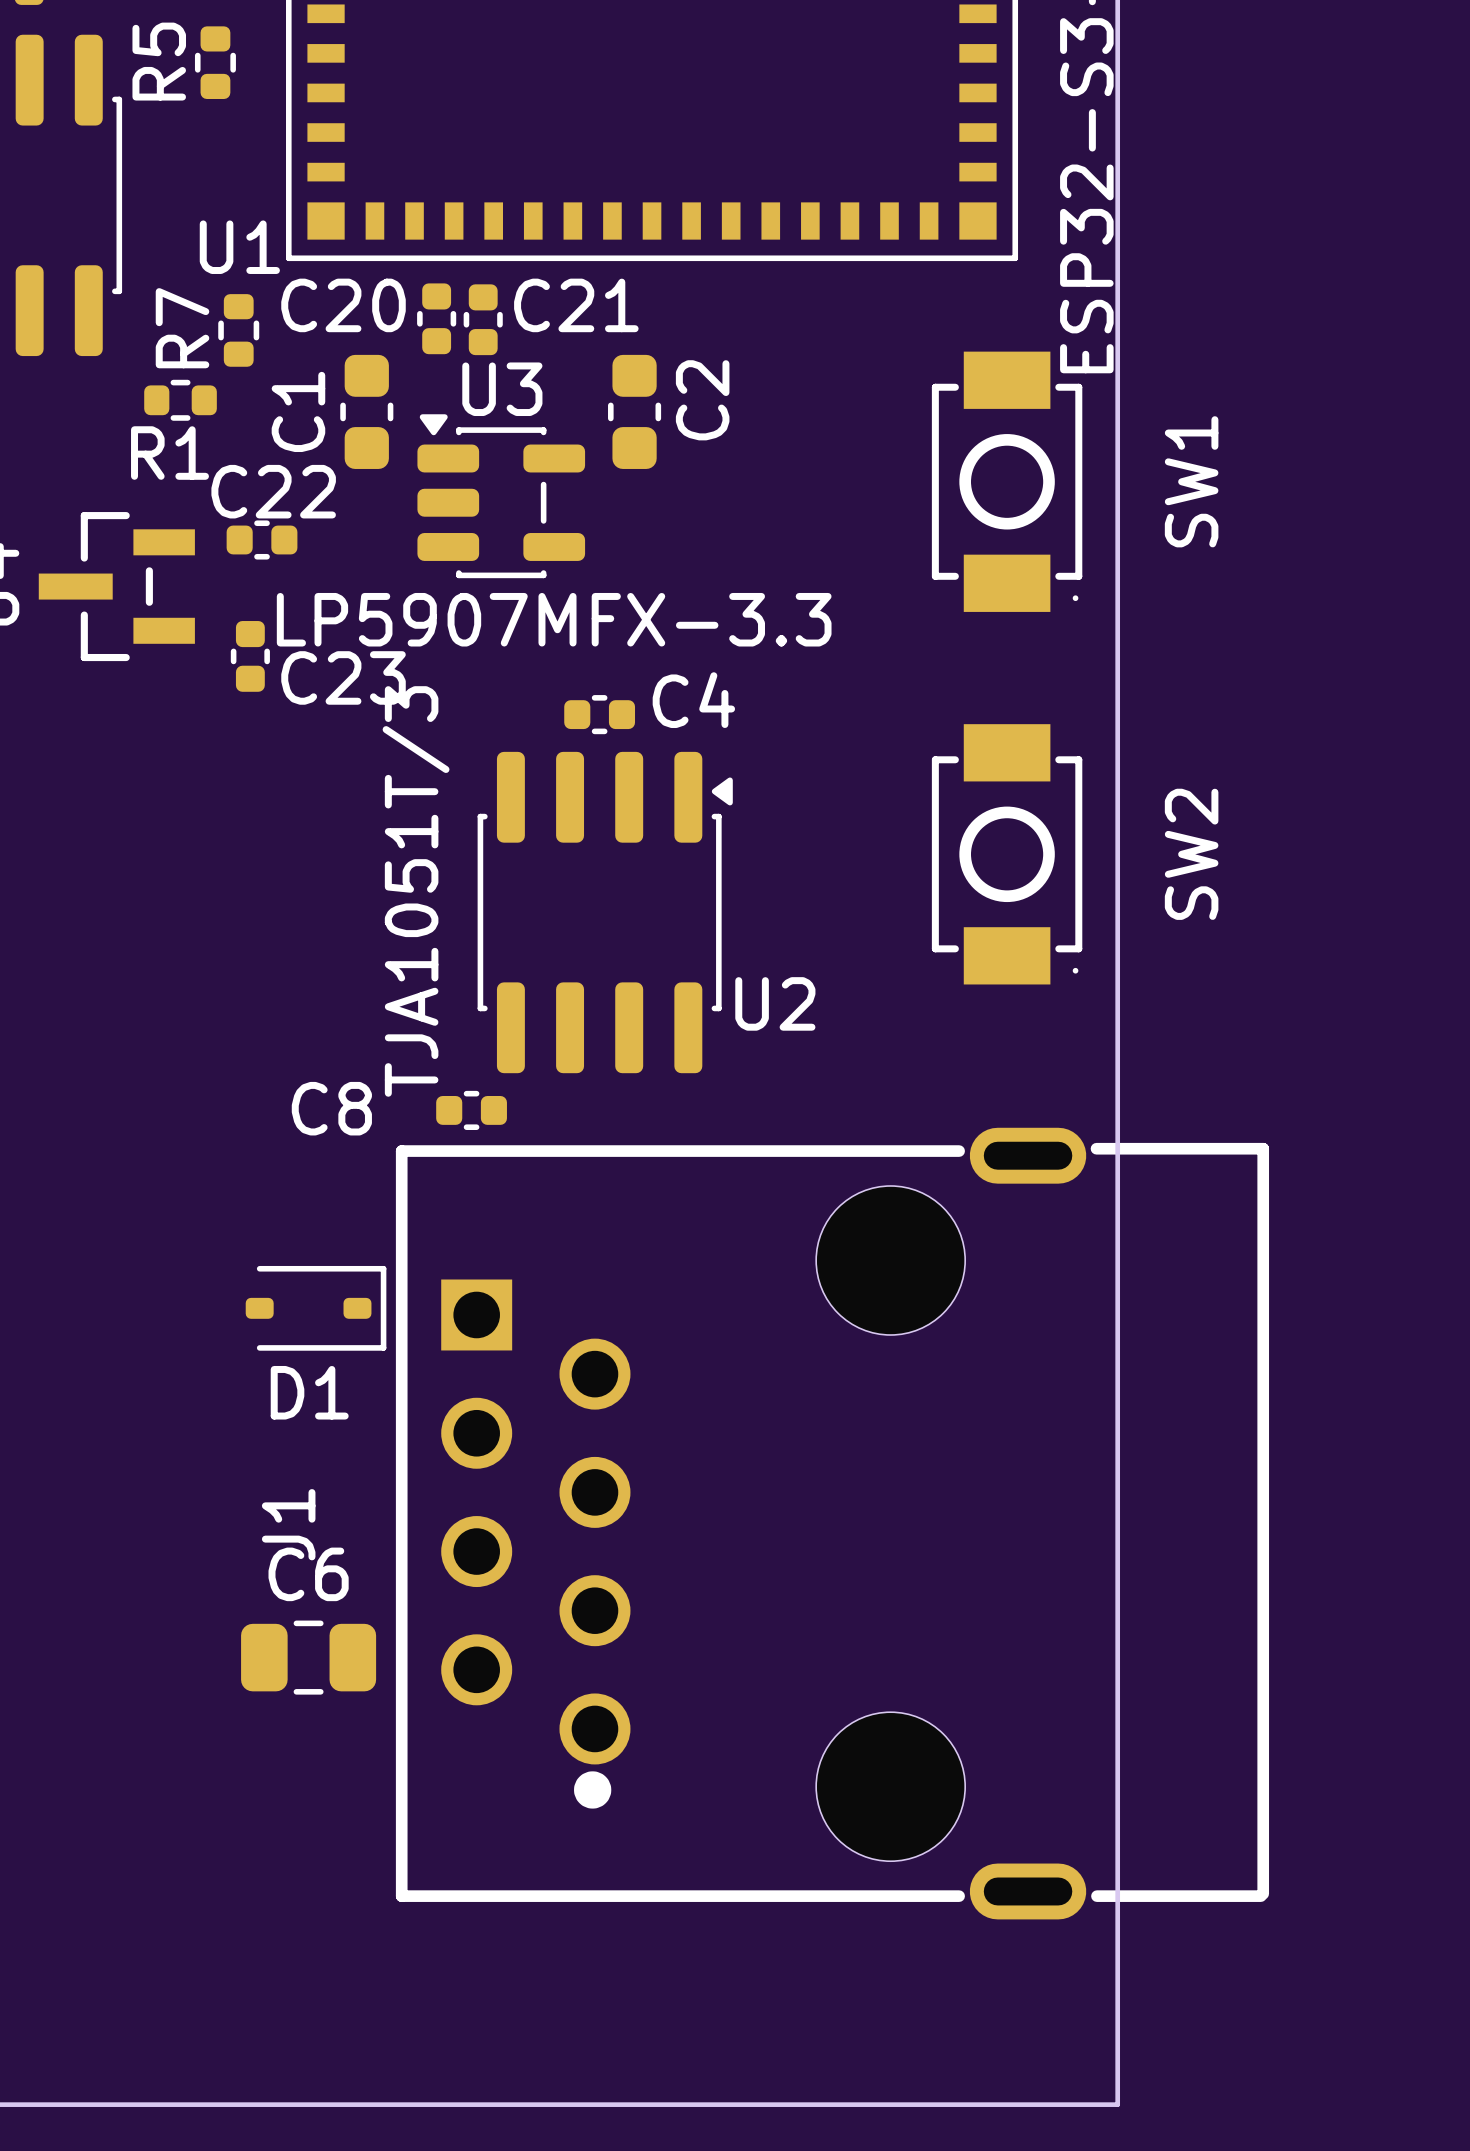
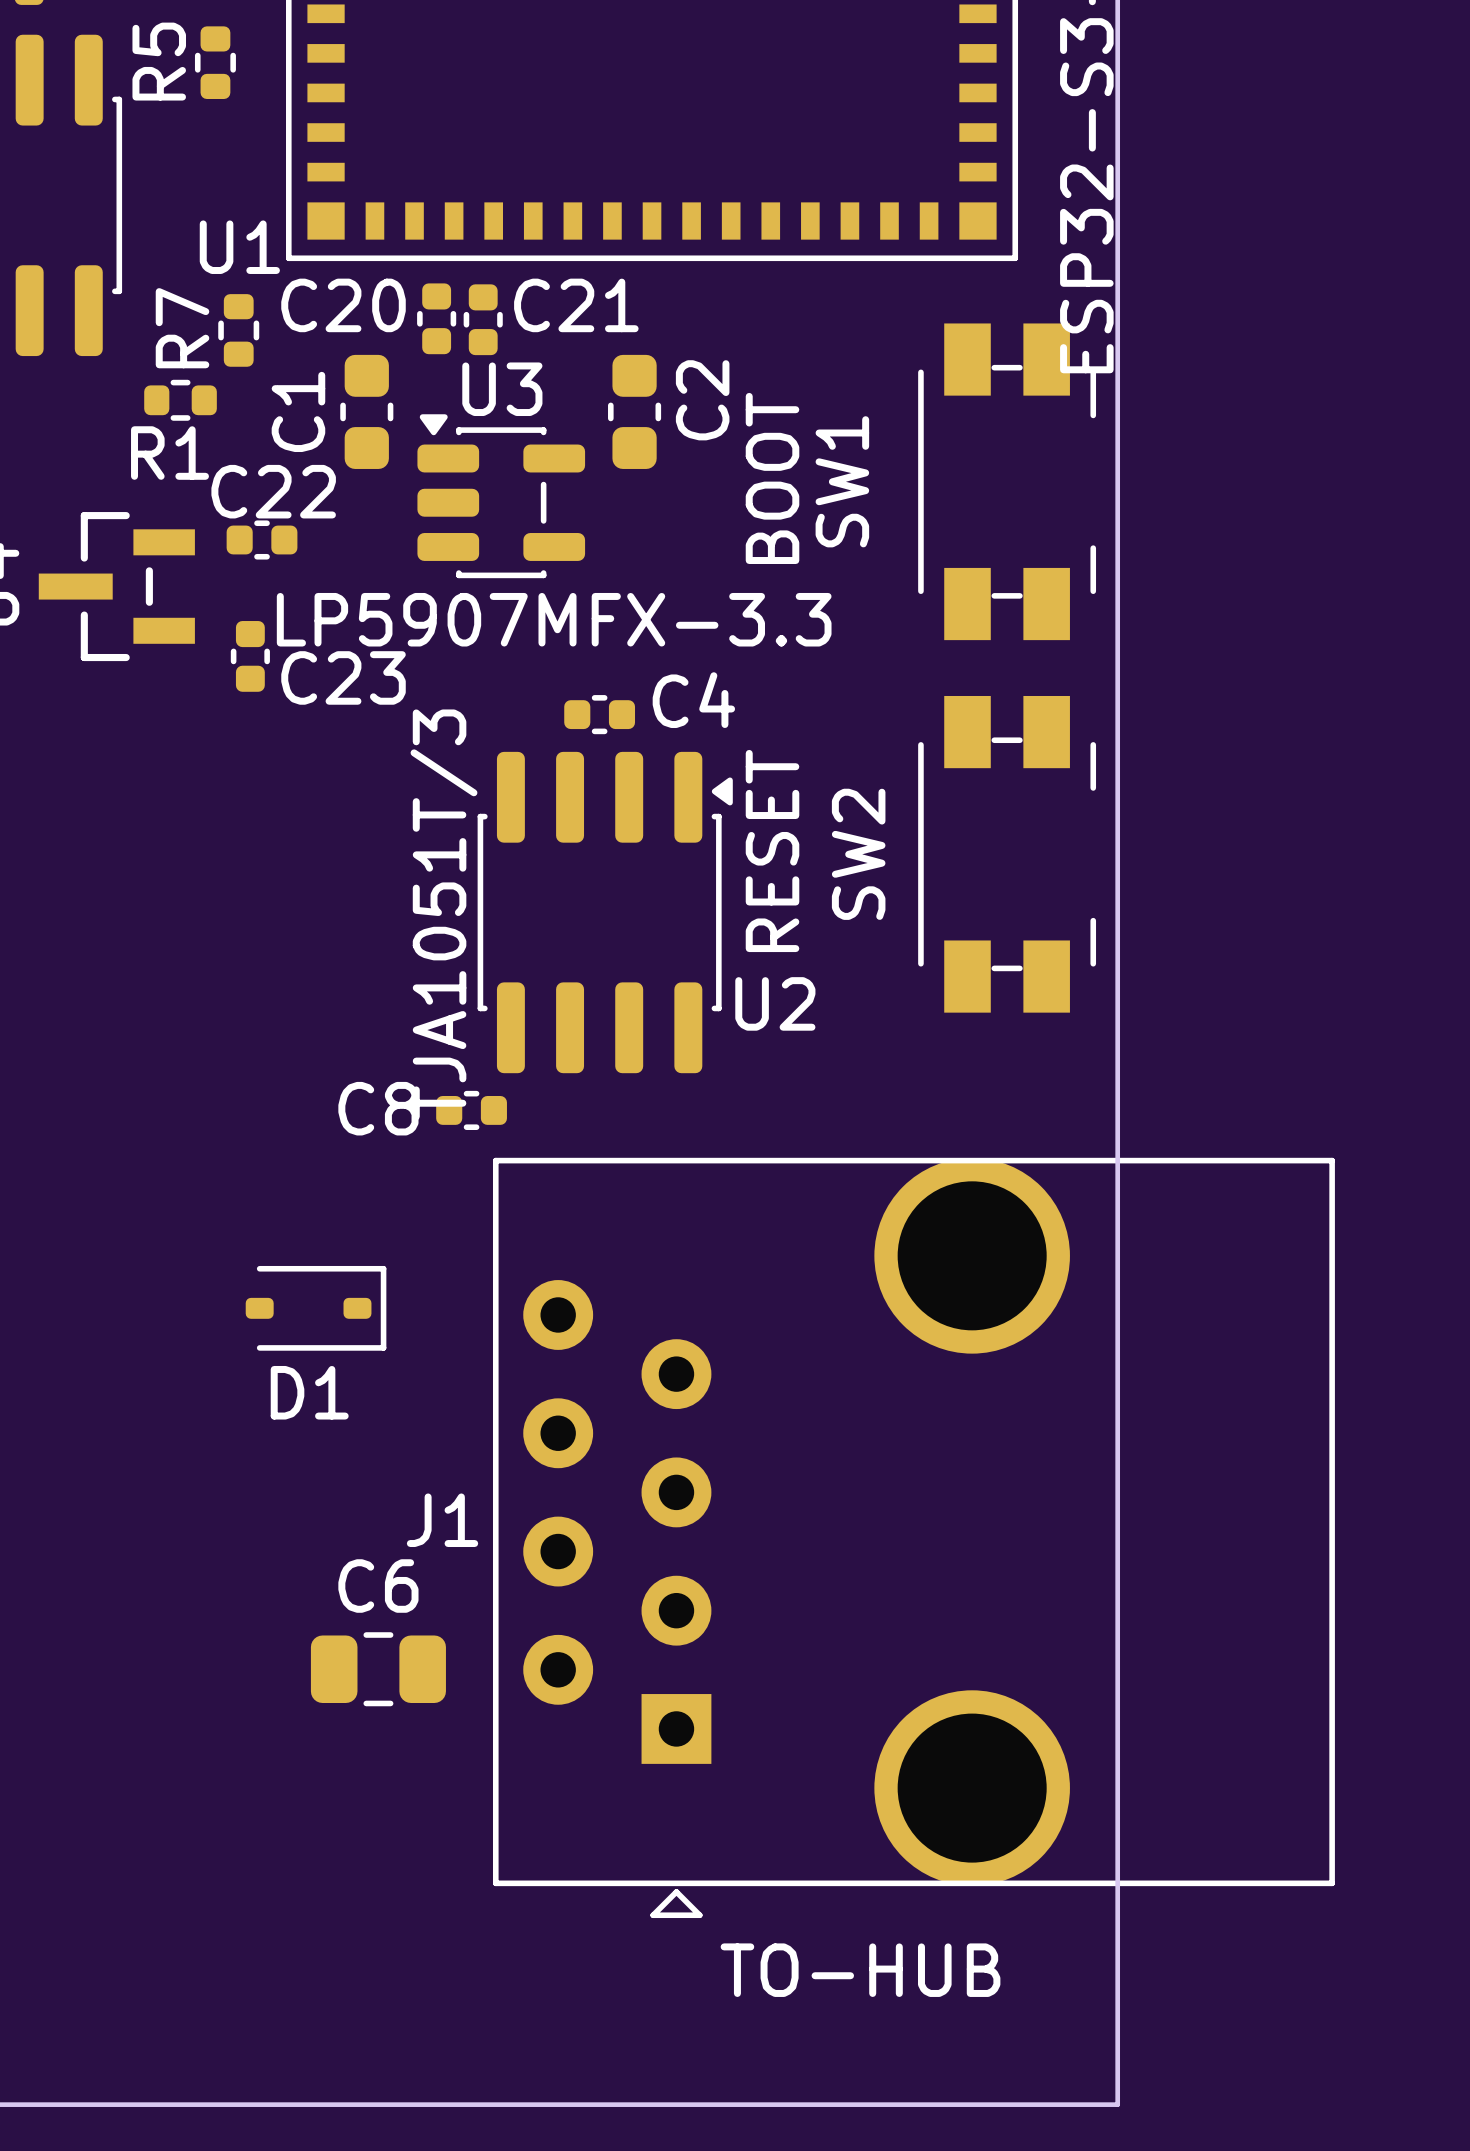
SW1 footprint: [931, 351, 1083, 612] -> [918, 323, 1097, 641]
SW1 value: none -> BOOT (772, 478)
SW1 name position: SW1 (1191, 481) -> SW1 (842, 481)
SW2 footprint: [931, 724, 1083, 985] -> [918, 695, 1097, 1013]
SW2 value: none -> RESET (772, 850)
SW2 name position: SW2 (1191, 854) -> SW2 (858, 854)
U2 value position: TJA1051T/3 (416, 891) -> TJA1051T/3 (443, 914)
C8 name position: C8 (331, 1108) -> C8 (378, 1108)
J1 footprint: [395, 1127, 1270, 1920] -> [492, 1157, 1335, 1919]
C6 position: (308, 1657) -> (378, 1669)
J1 value: none -> TO-HUB (860, 1970)

